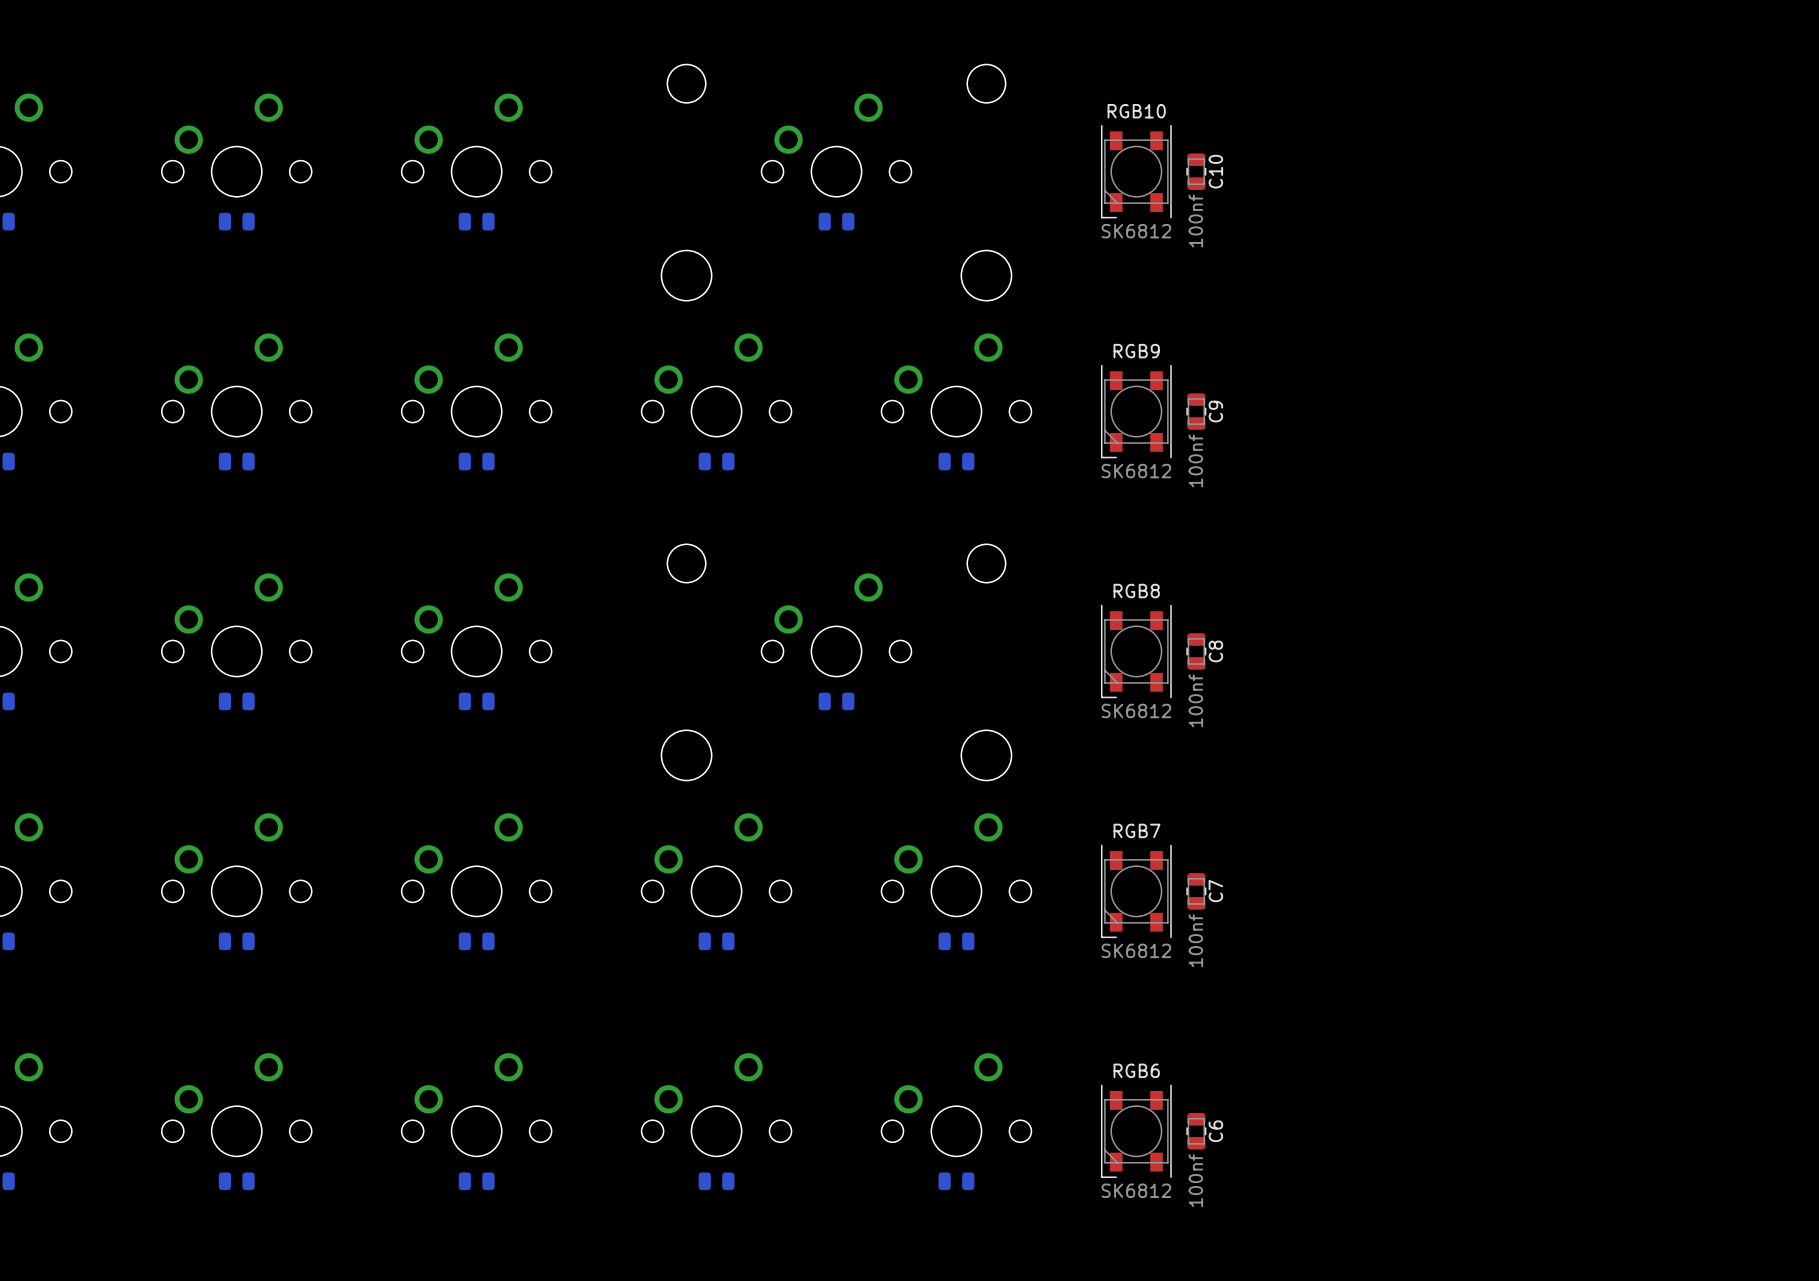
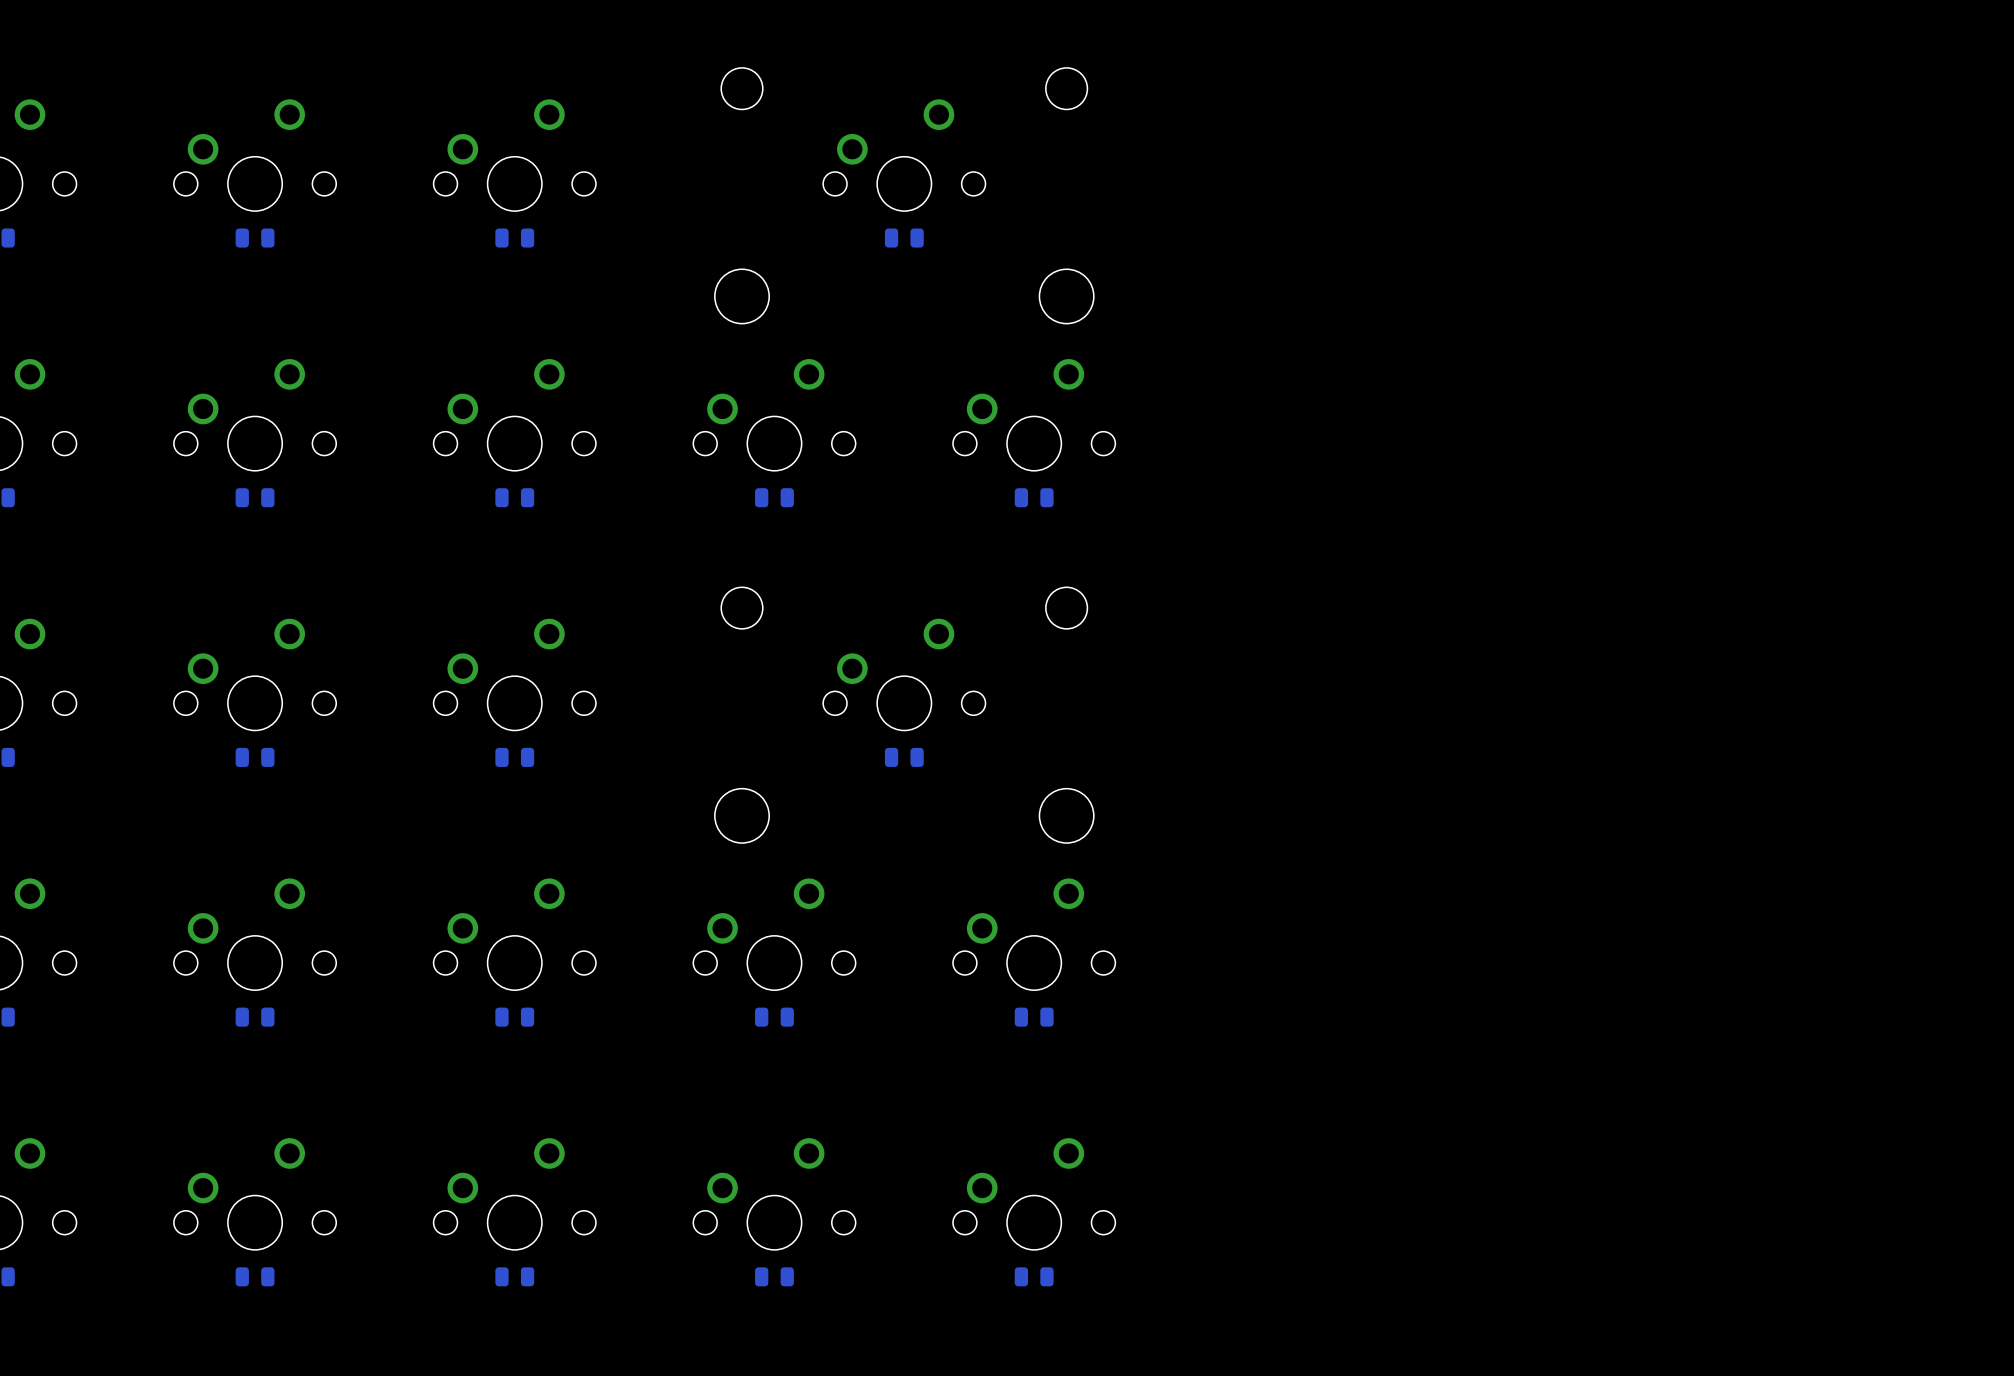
RGB10: SK6812 (1136, 171) -> none
C10: 100nf (1196, 171) -> none
RGB9: SK6812 (1136, 411) -> none
C9: 100nf (1196, 411) -> none
RGB8: SK6812 (1136, 651) -> none
C8: 100nf (1196, 651) -> none
RGB7: SK6812 (1136, 891) -> none
C7: 100nf (1196, 891) -> none
RGB6: SK6812 (1136, 1131) -> none
C6: 100nf (1196, 1131) -> none

